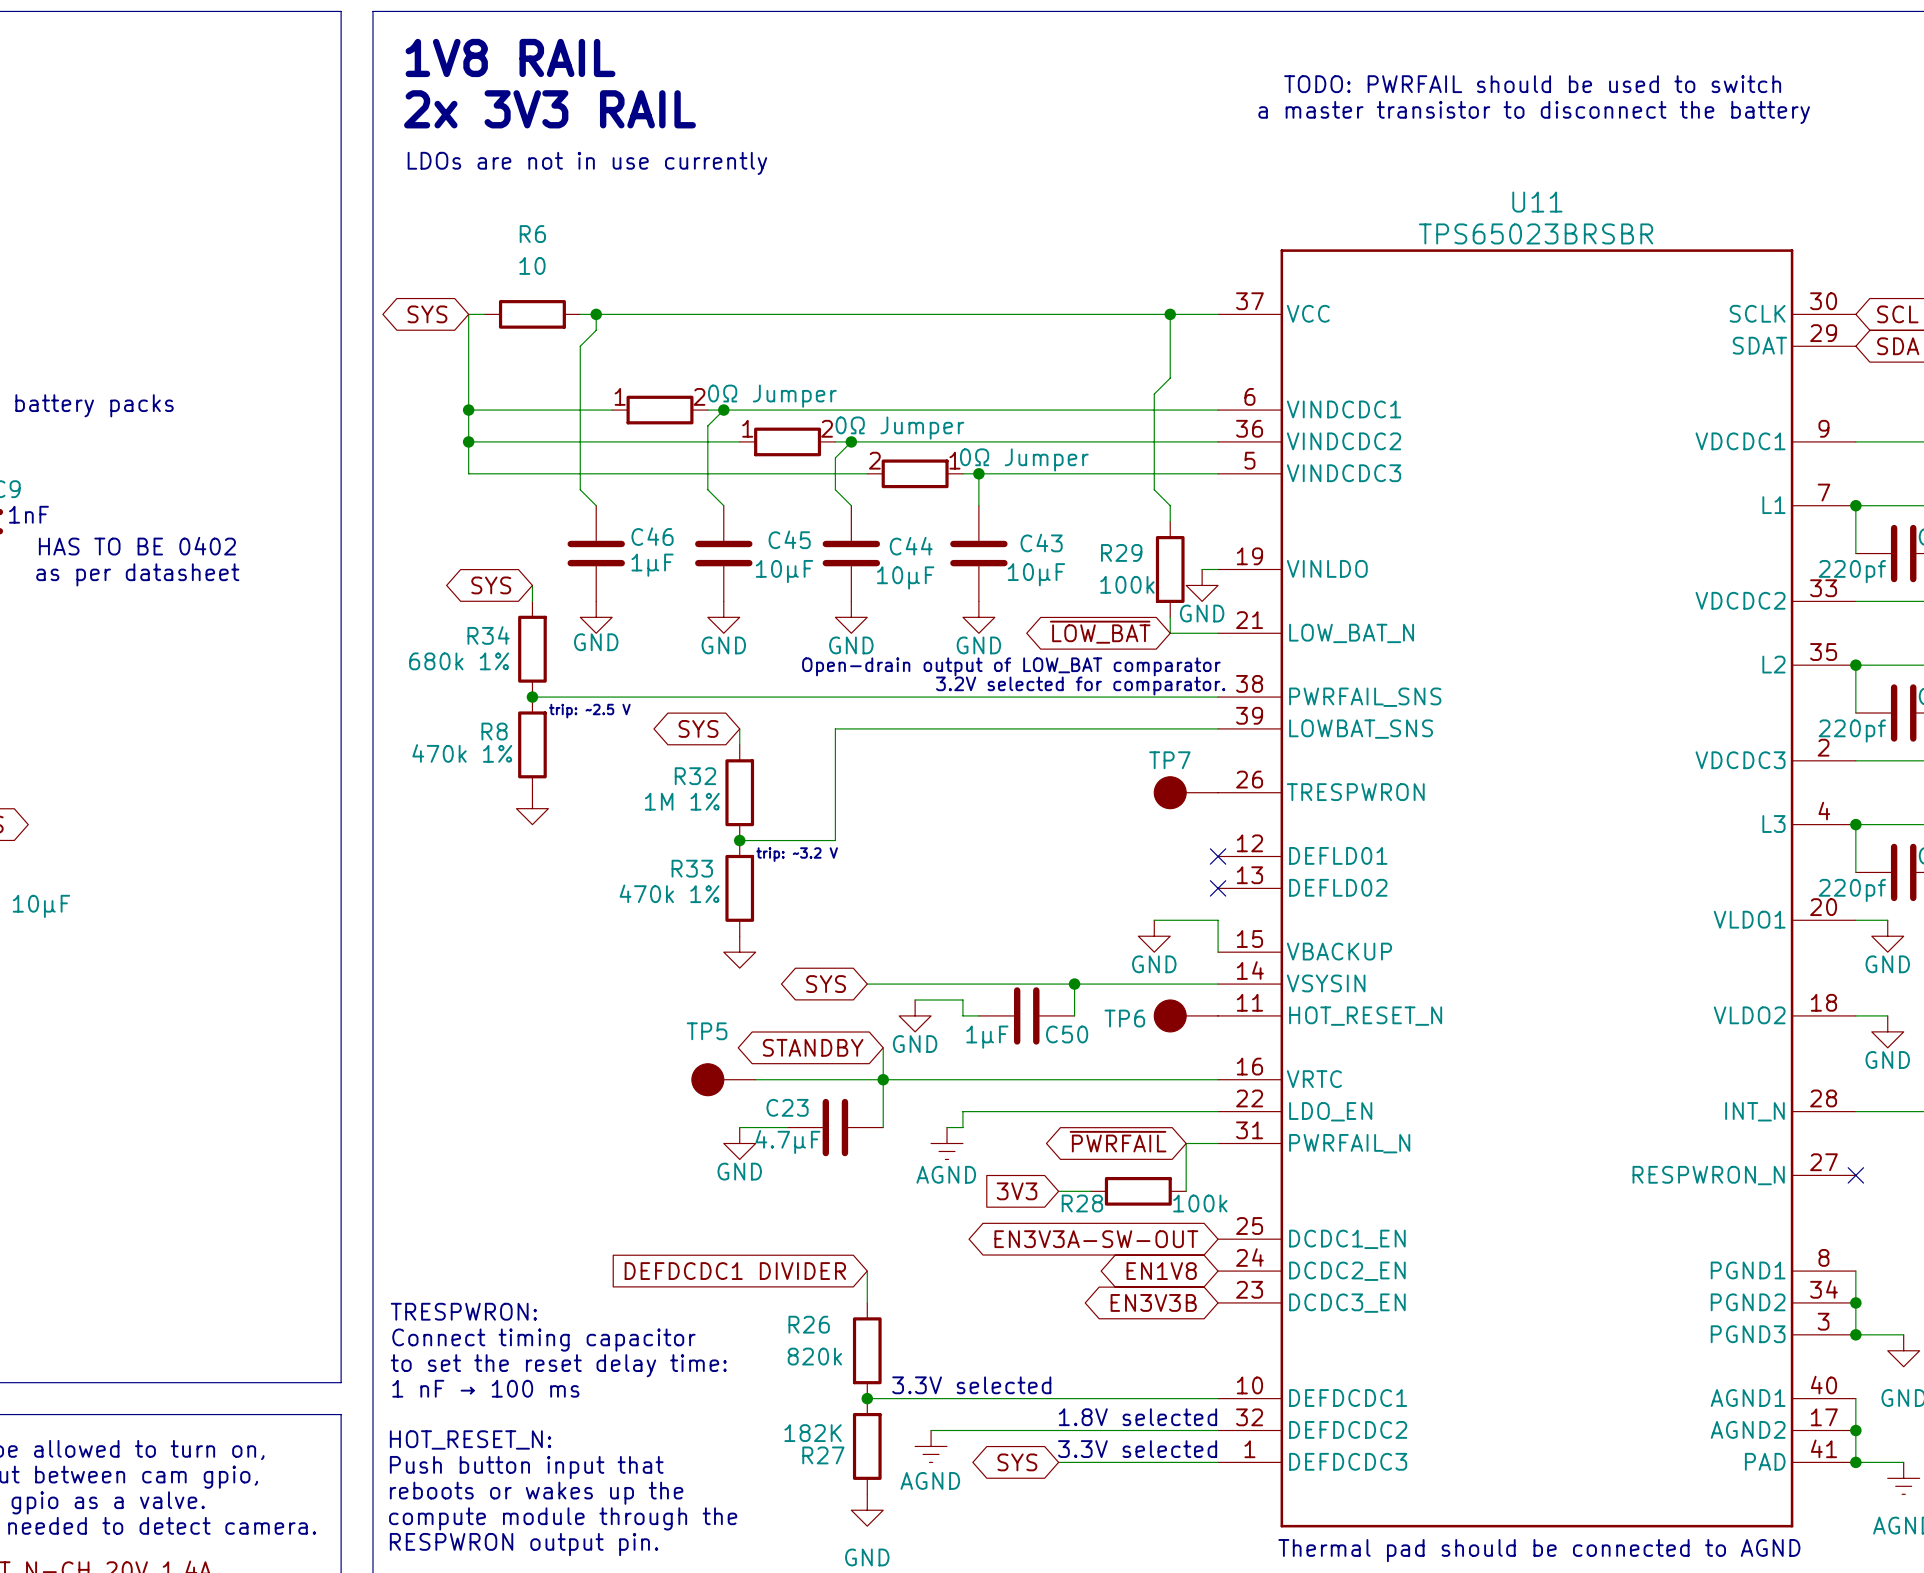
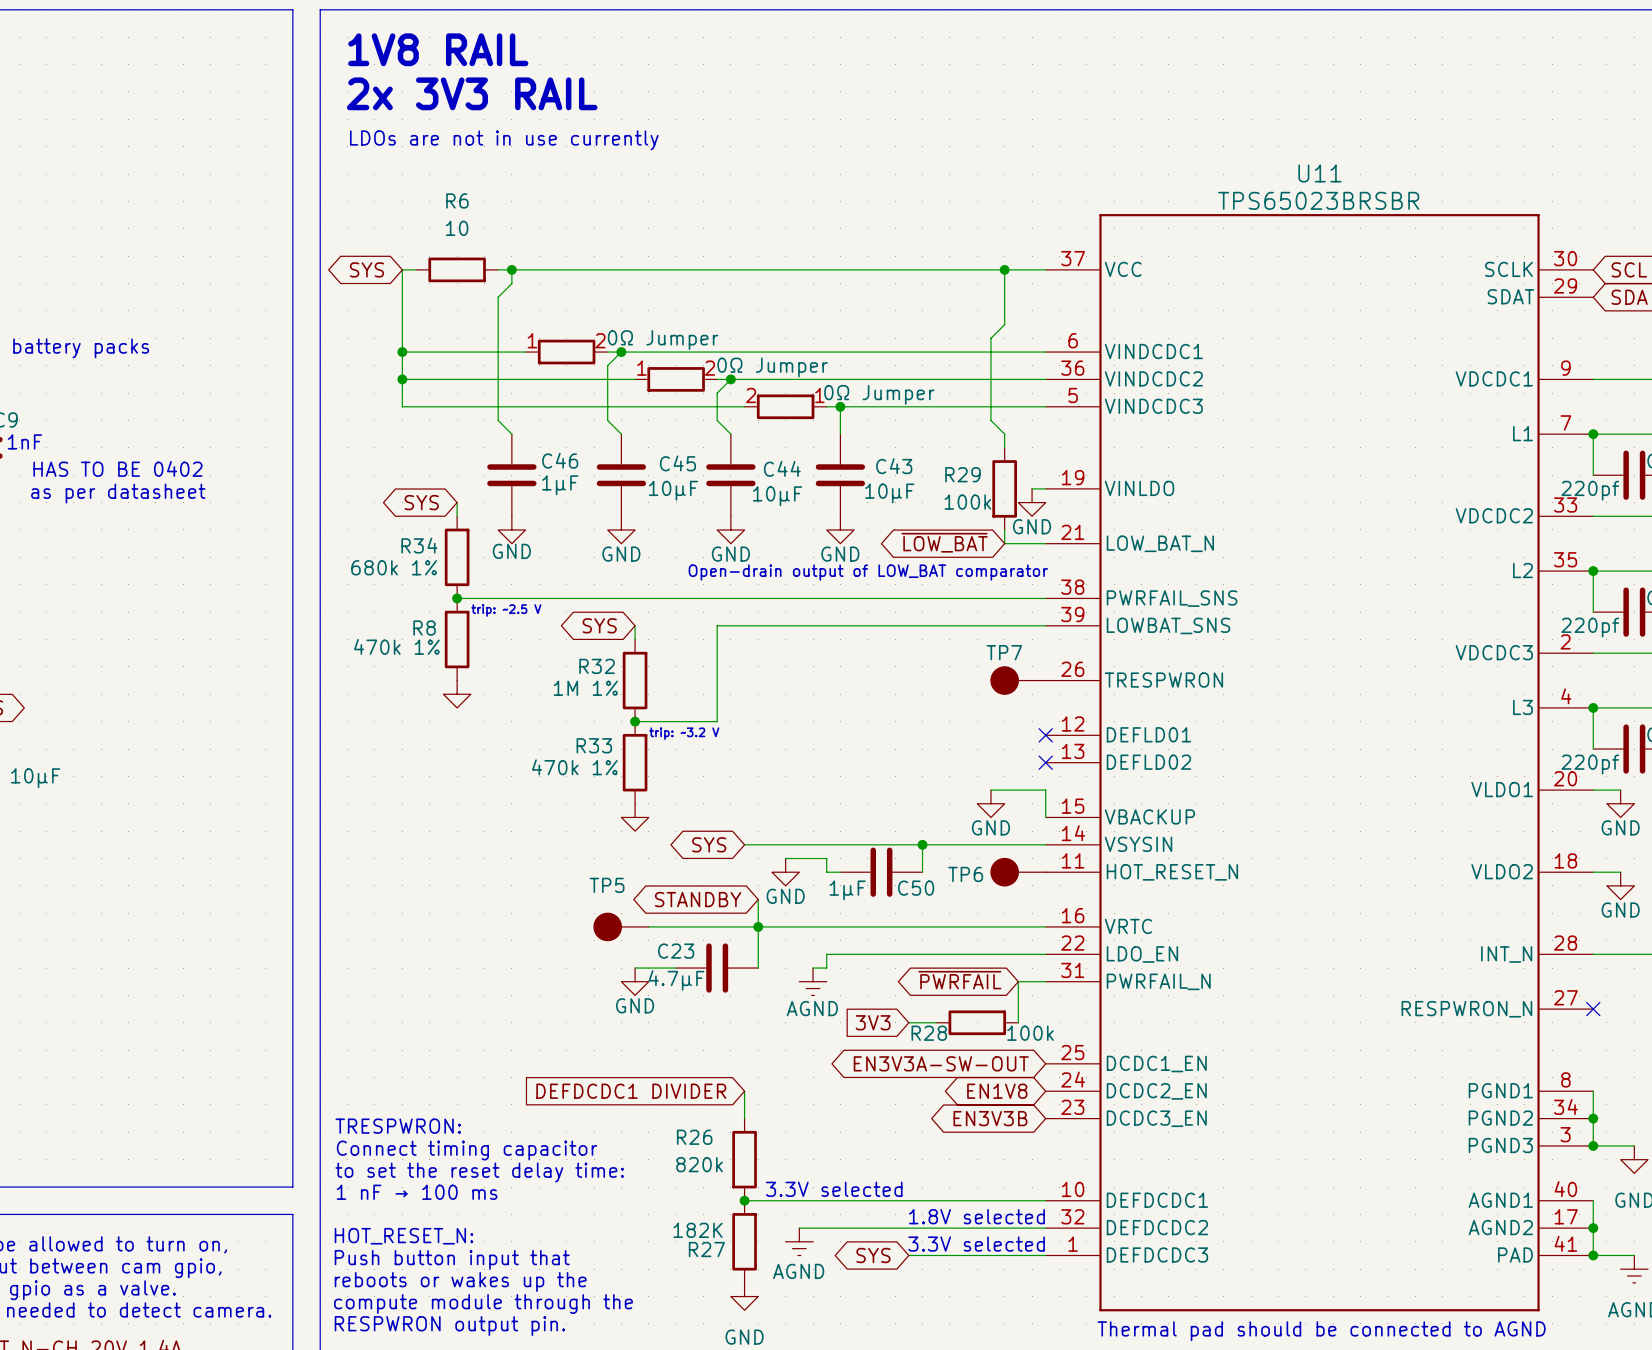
text: TODO: PWRFAIL should be used to switch (1532, 84) -> none
text: a master transistor to disconnect the battery (1534, 112) -> none
text: 3.2V selected for comparator. (1080, 685) -> none

